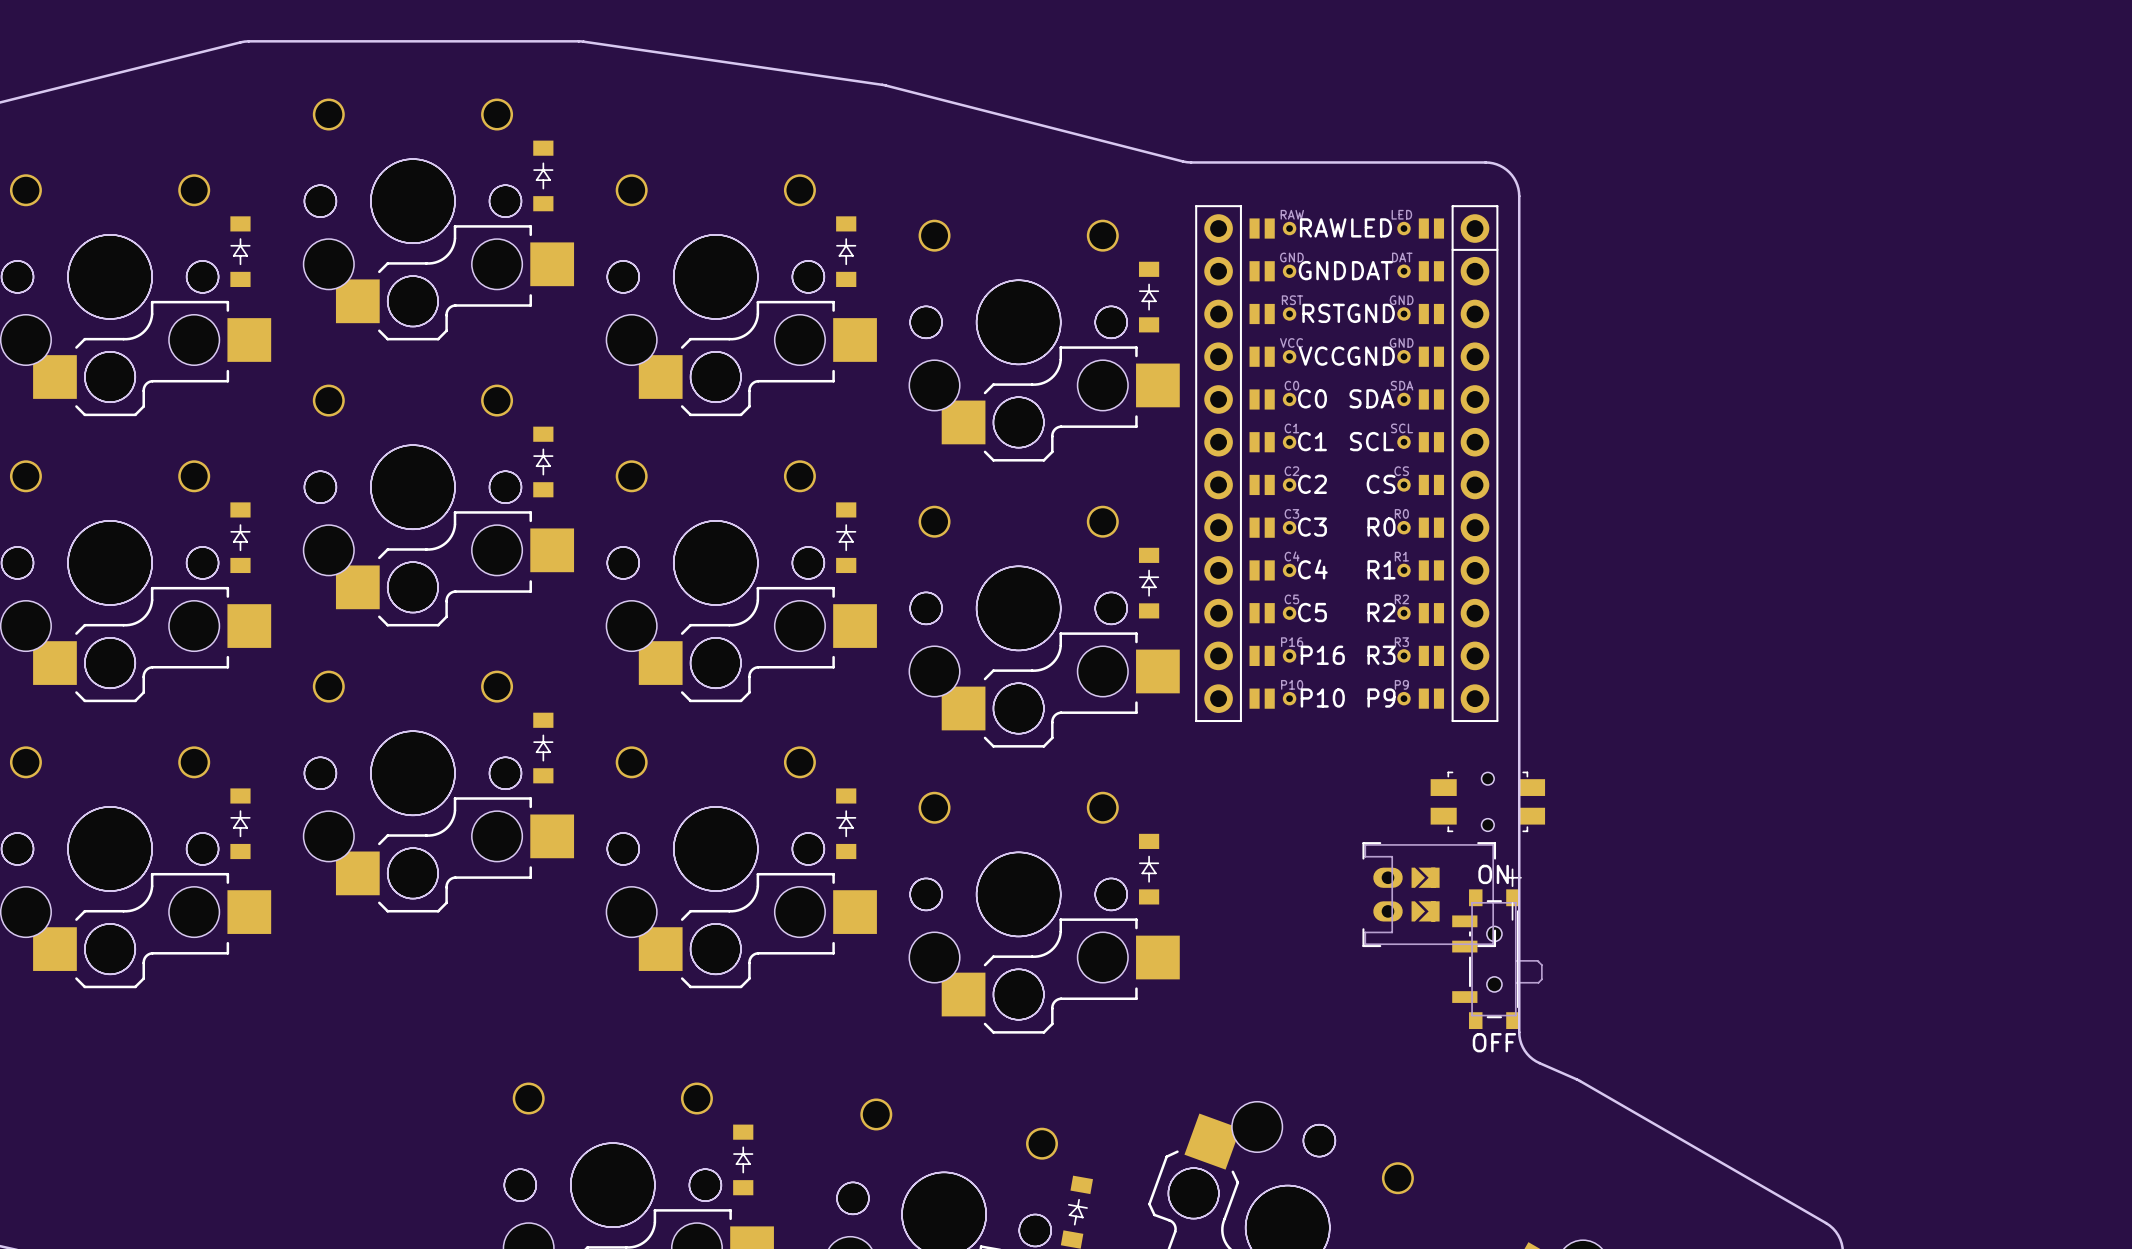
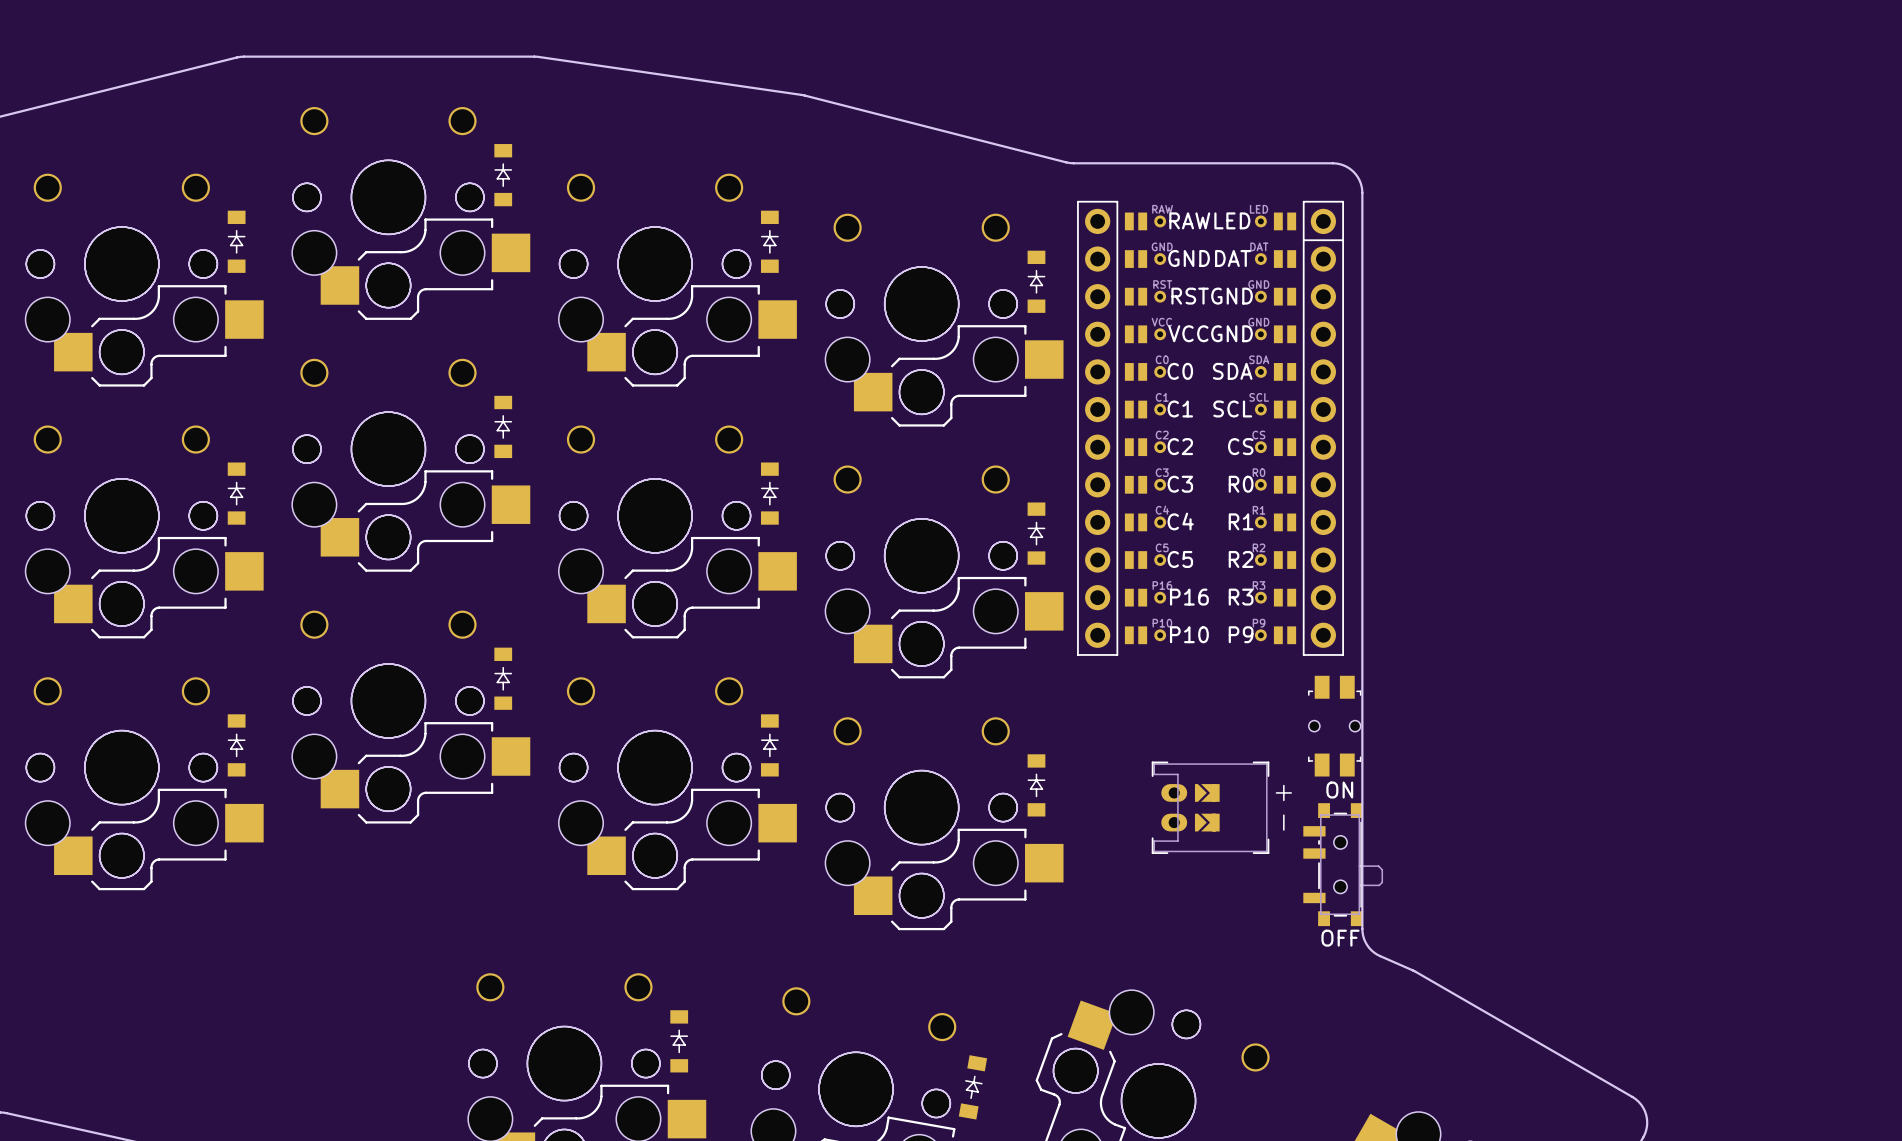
part rotation: 0° (1487, 801) -> 90° clockwise (1334, 726)
part position: (1442, 894) -> (1221, 807)

